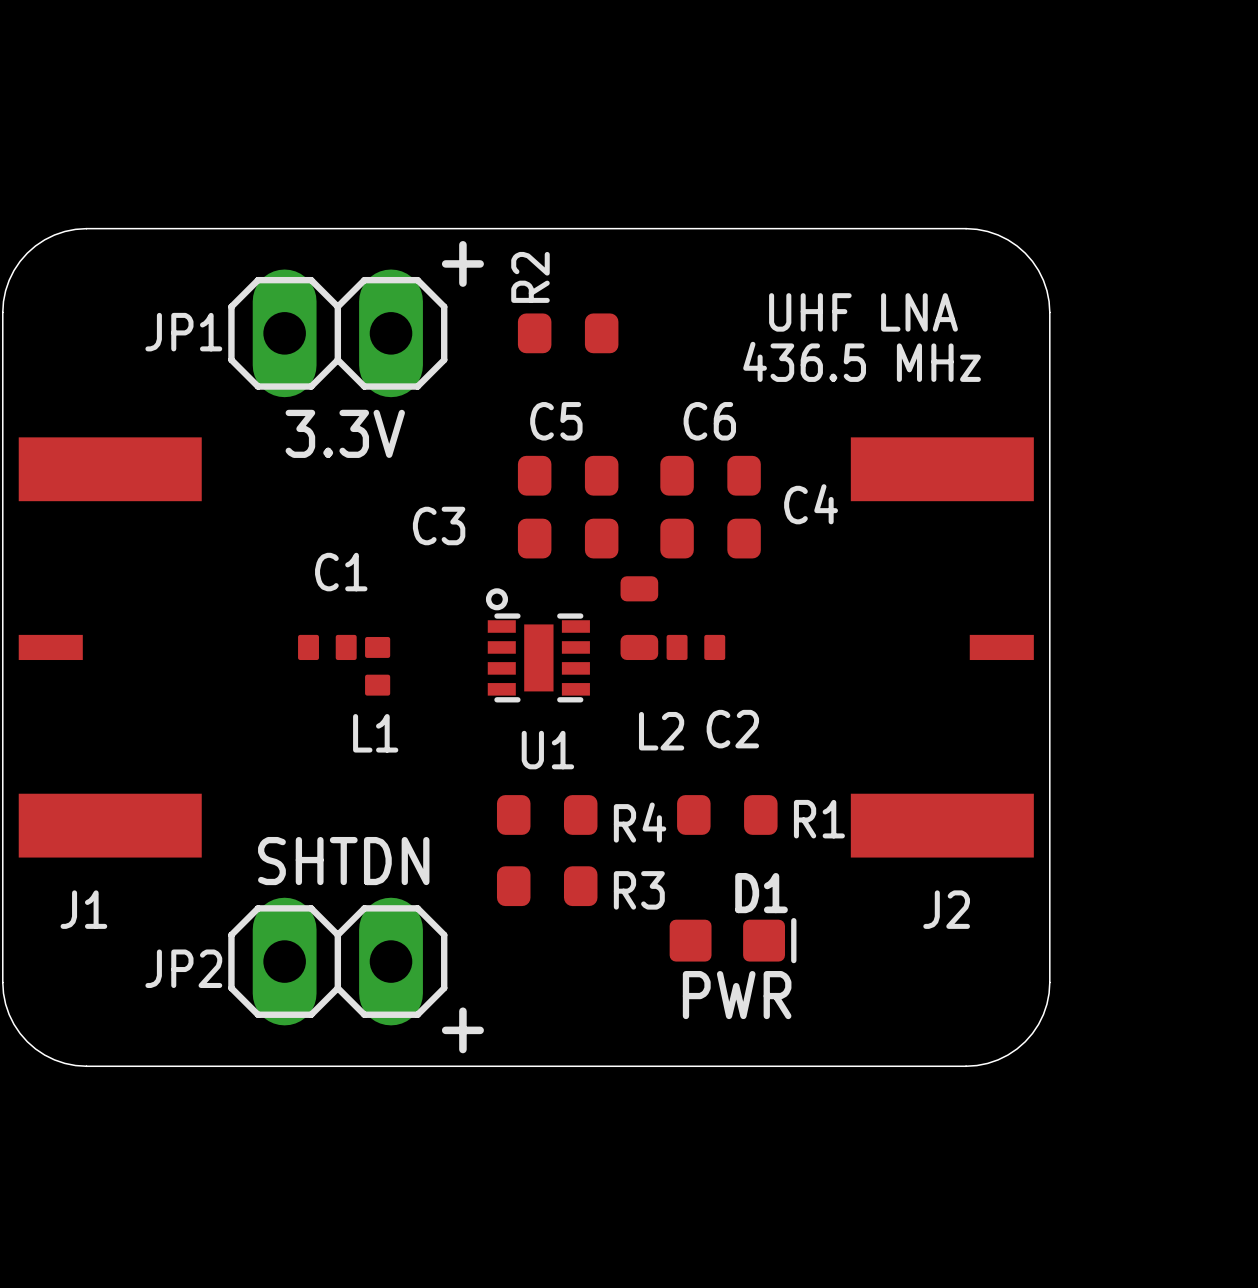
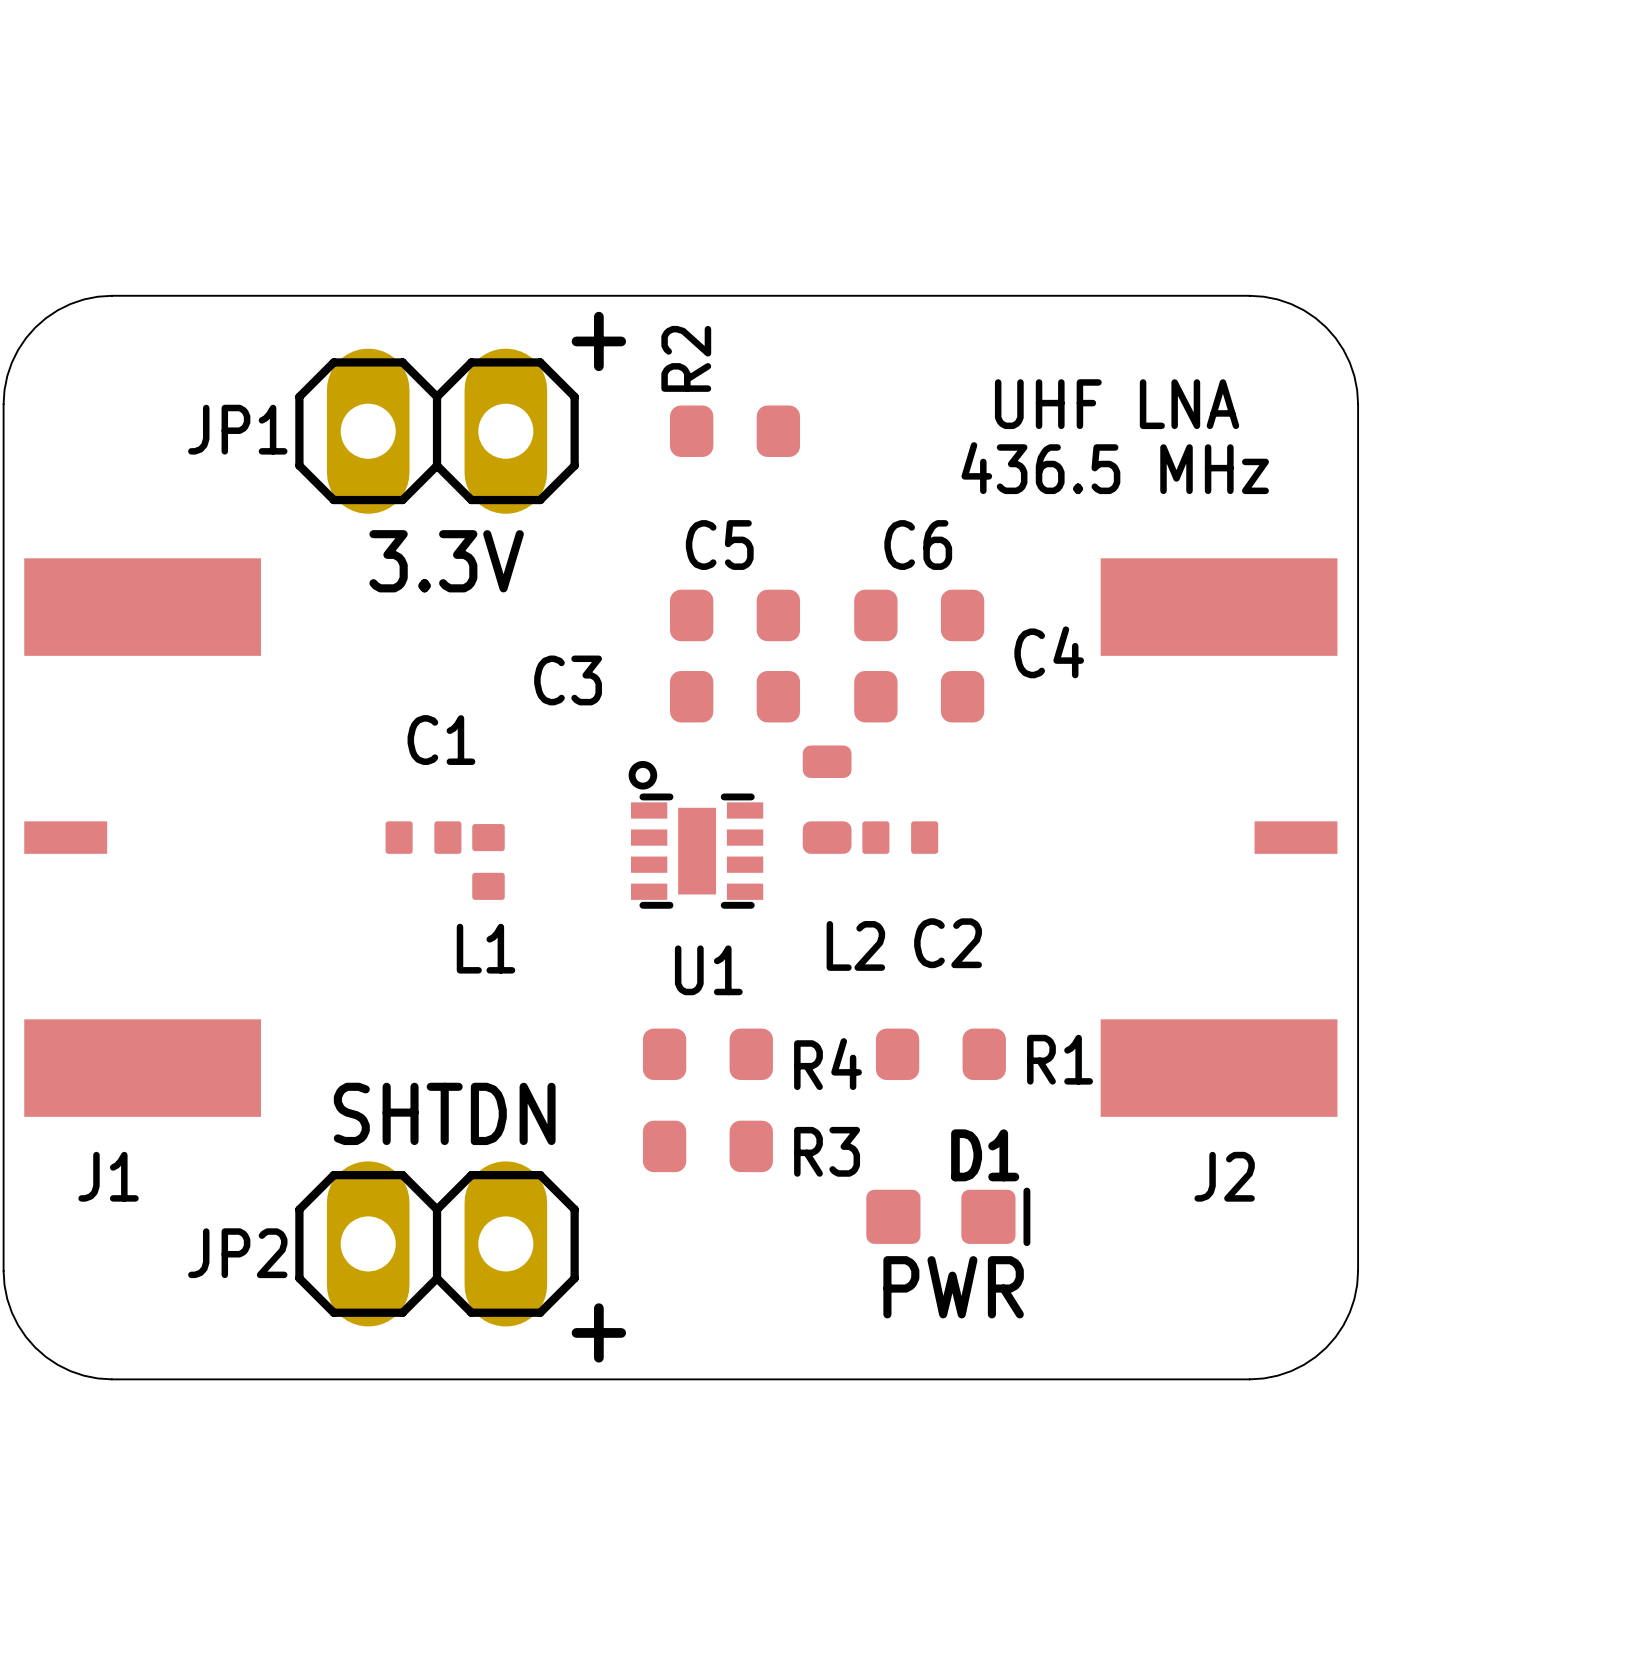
J1 footprint: [18, 437, 202, 858] -> [24, 558, 262, 1117]
J2 footprint: [850, 437, 1034, 858] -> [1100, 558, 1338, 1117]

